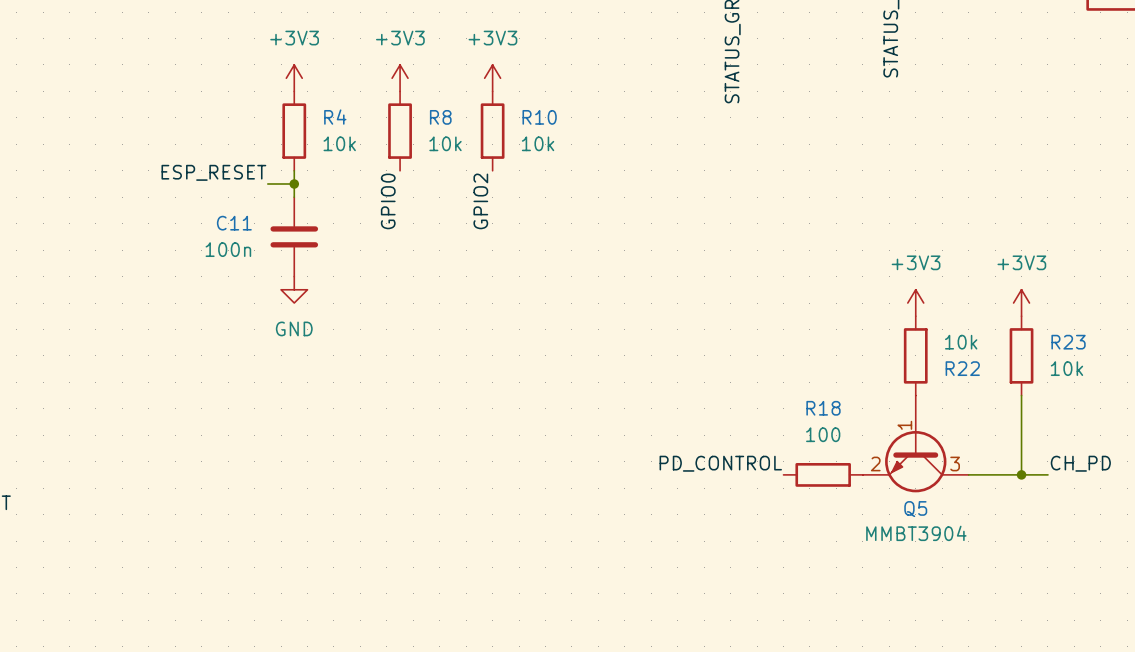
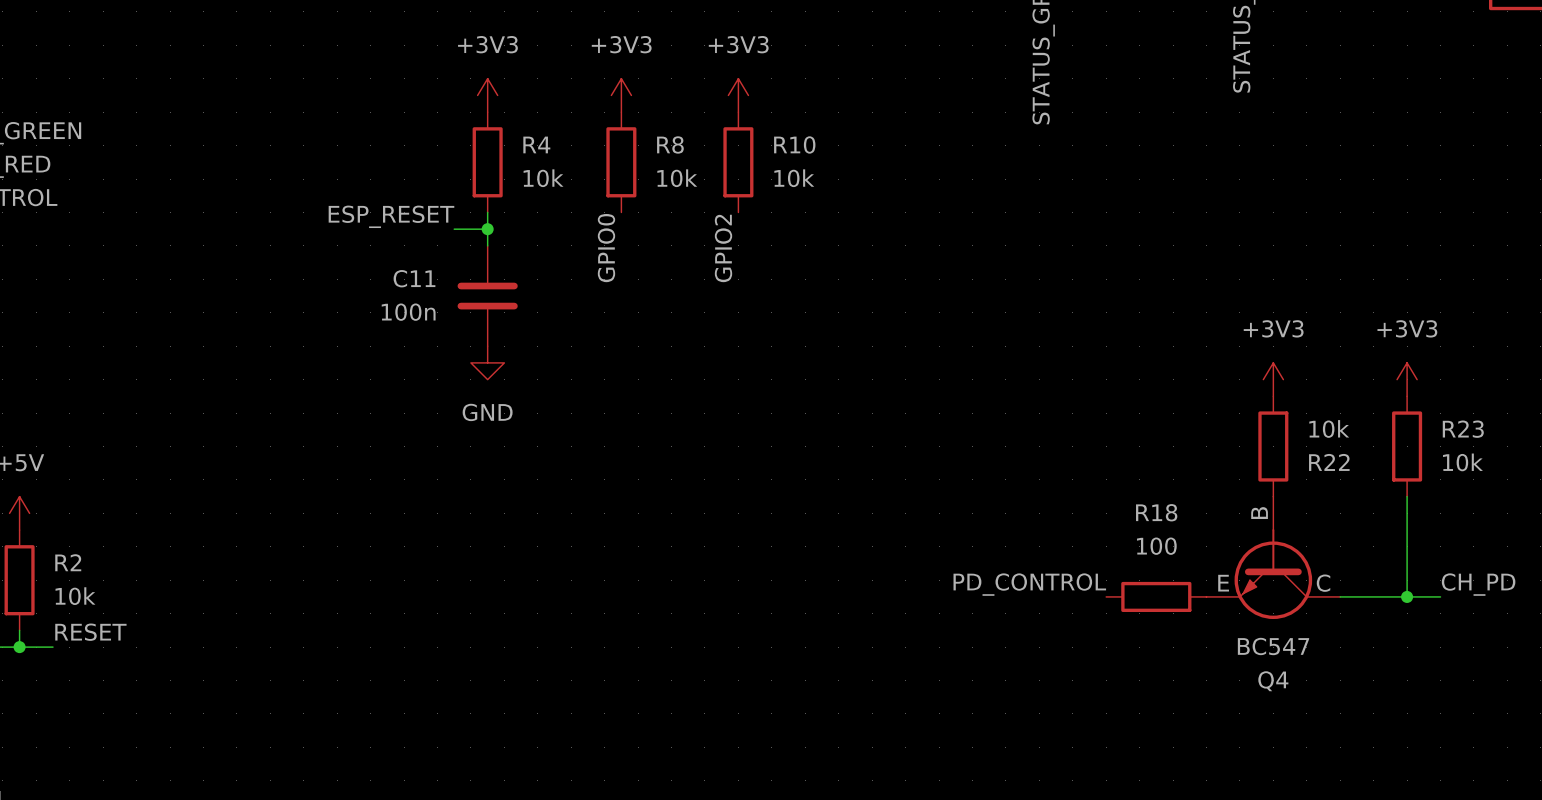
Q5: MMBT3904 (915, 443) -> none
Q4: none -> BC547 (1273, 557)

